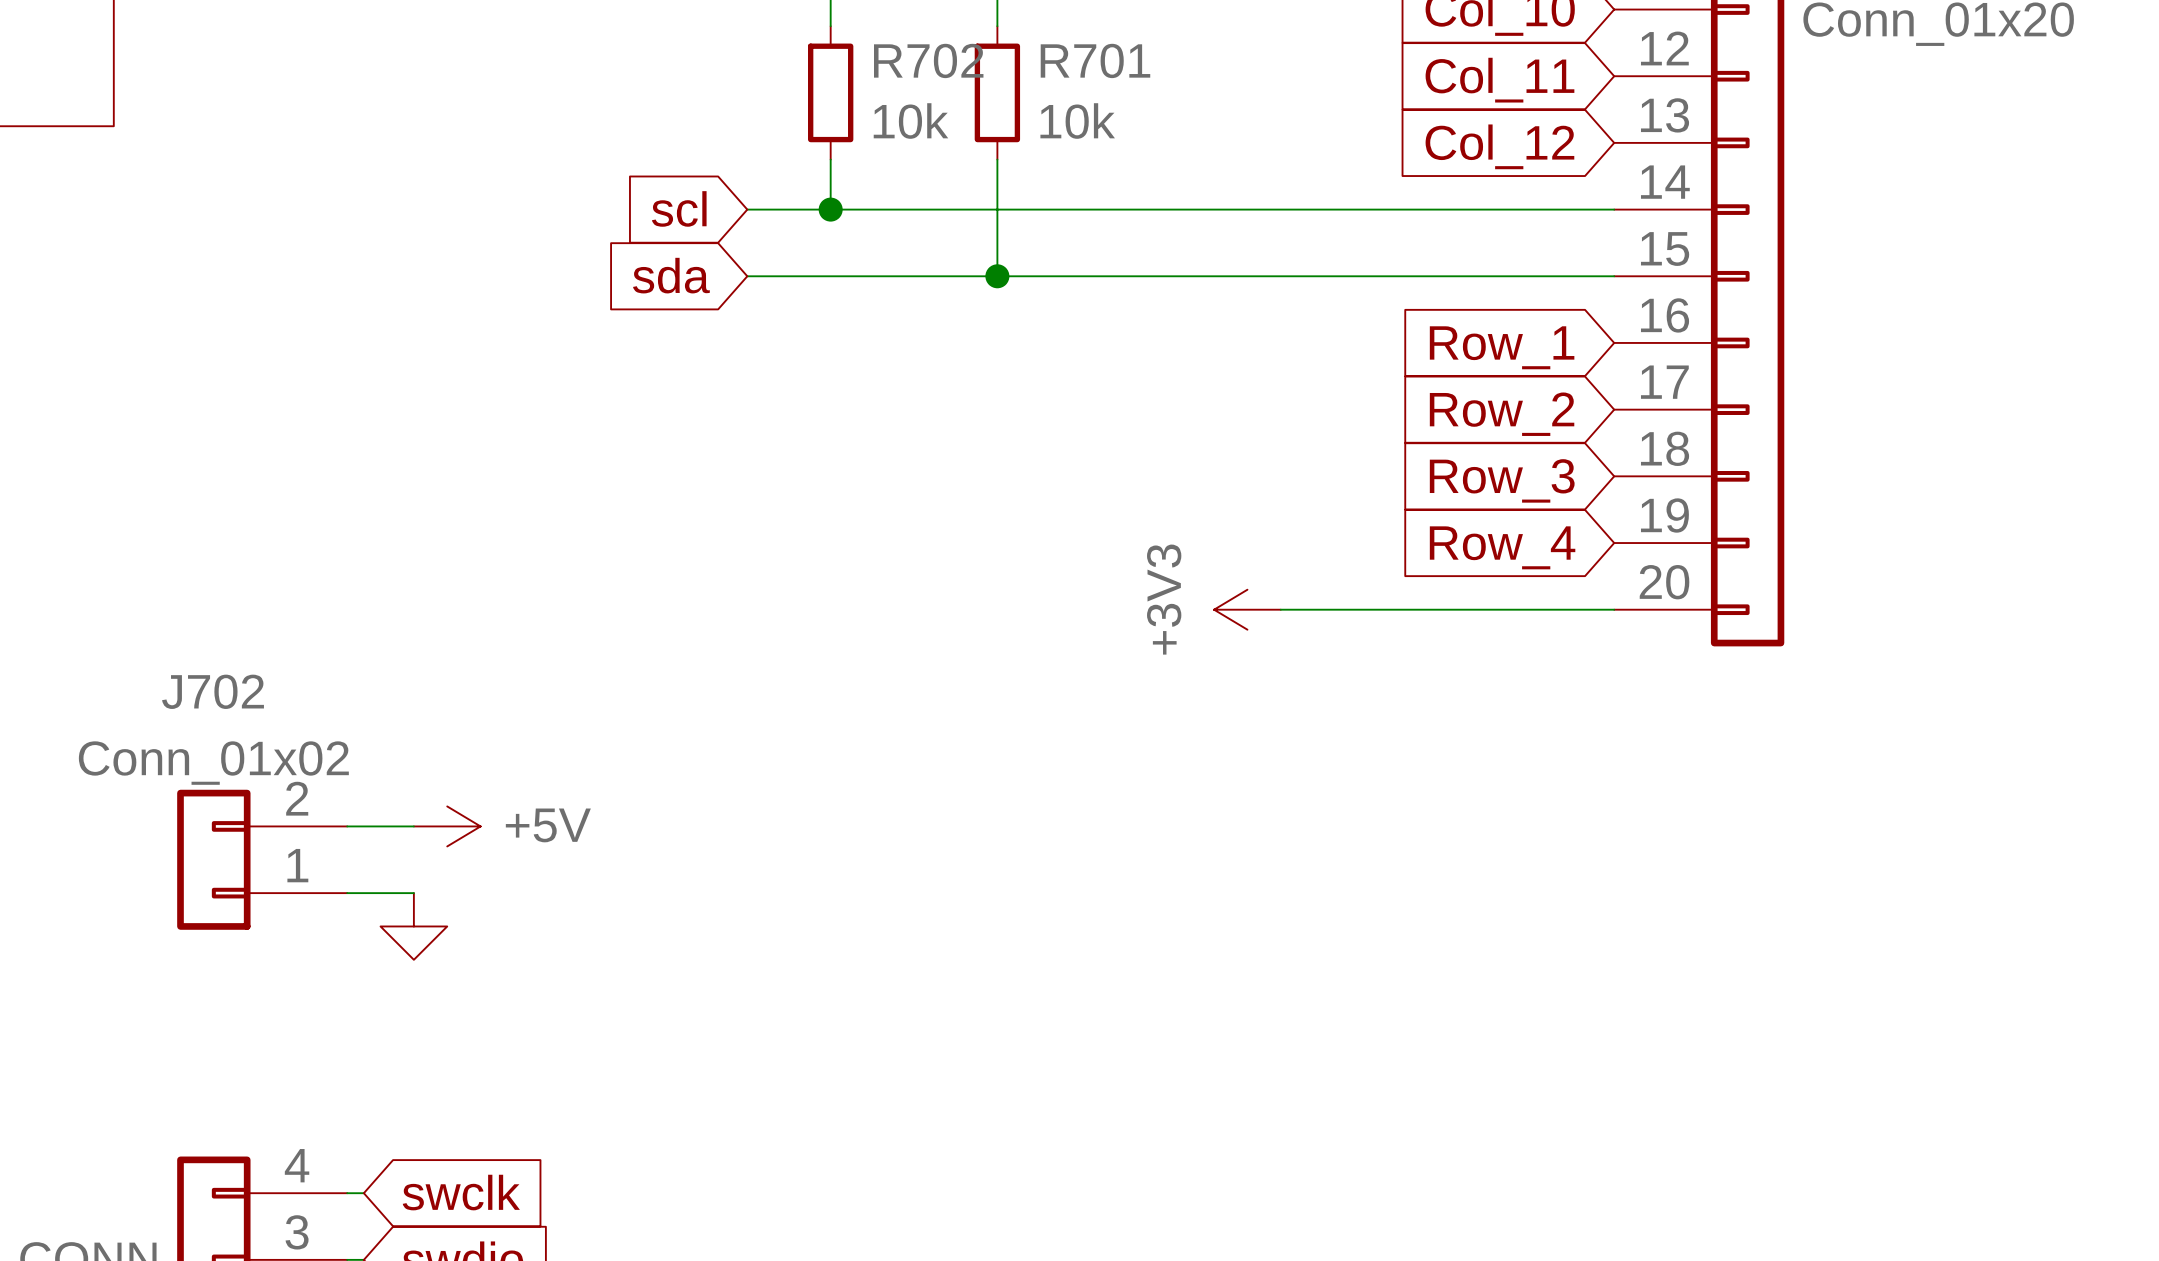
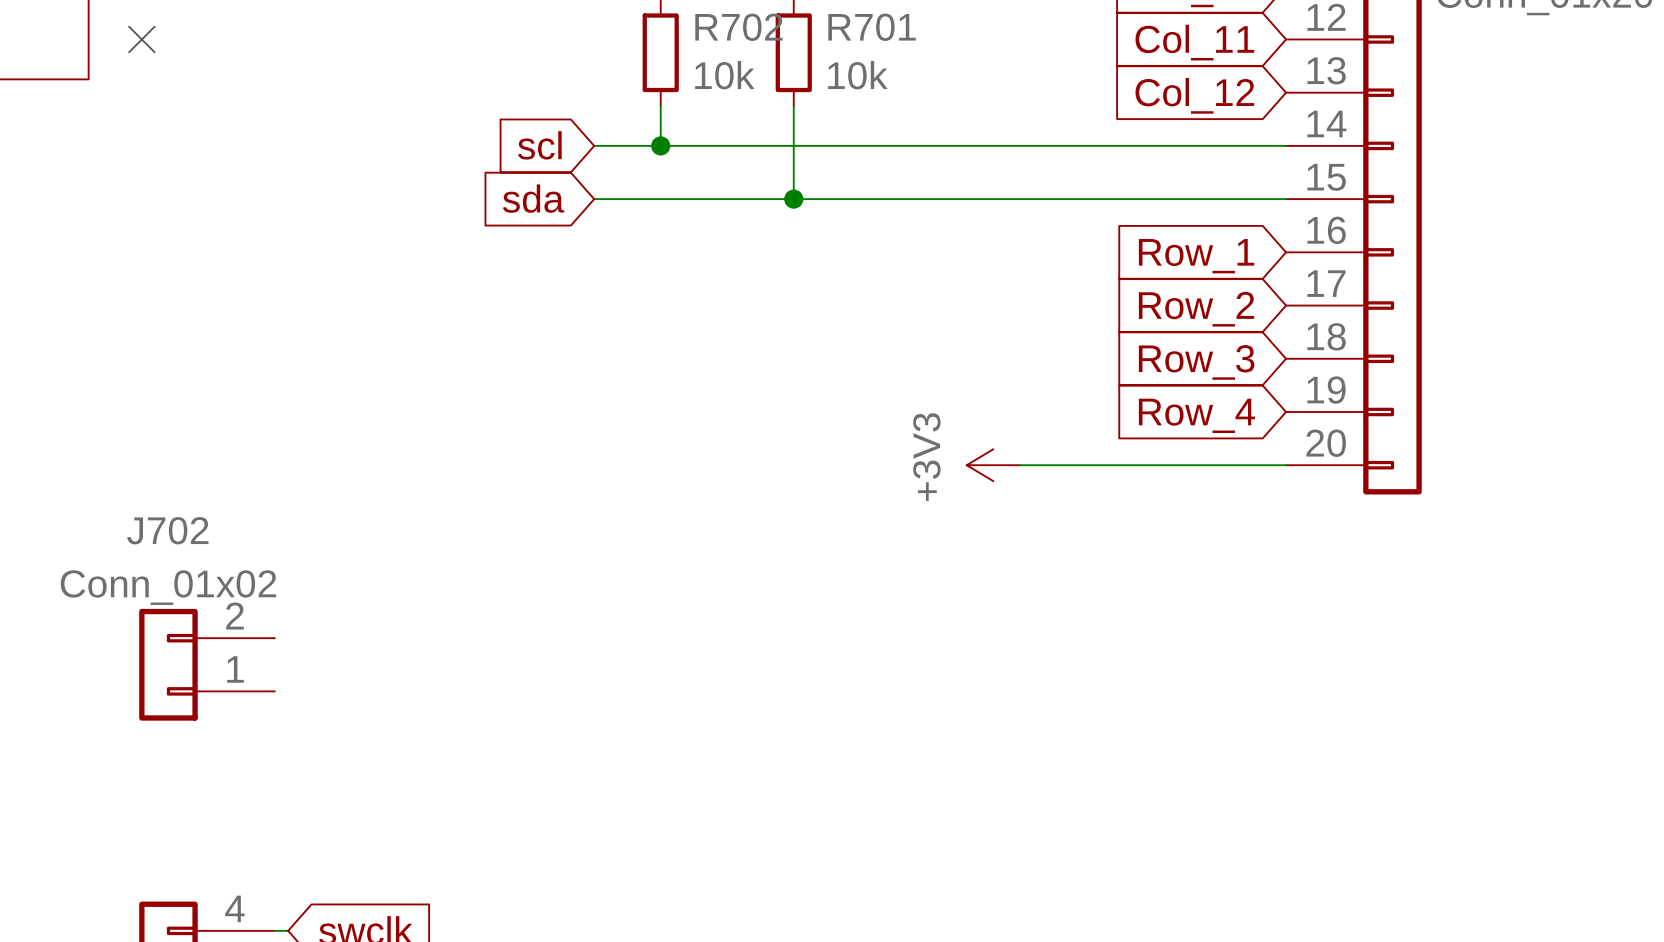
no-connect mark: none -> (141, 39)
wire: (347, 826) (413, 826) -> none
power symbol: +5V (447, 826) -> none
wire: (347, 893) (413, 893) -> none
power symbol: (413, 926) -> none

